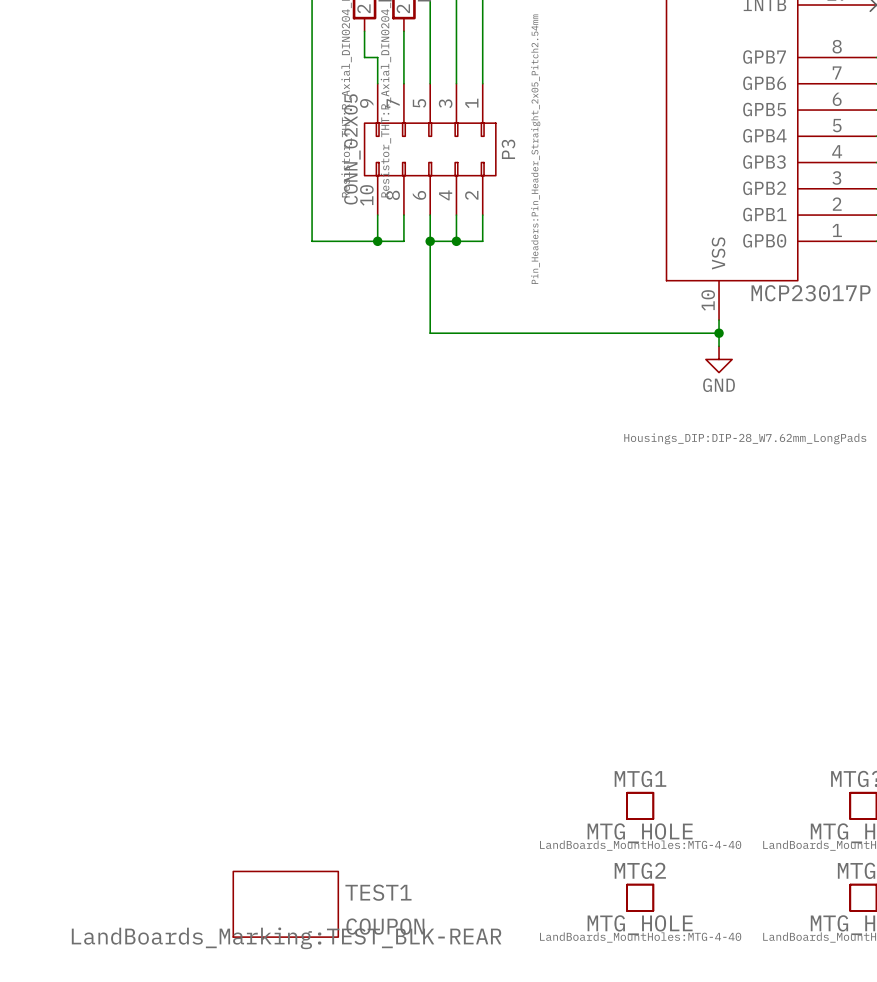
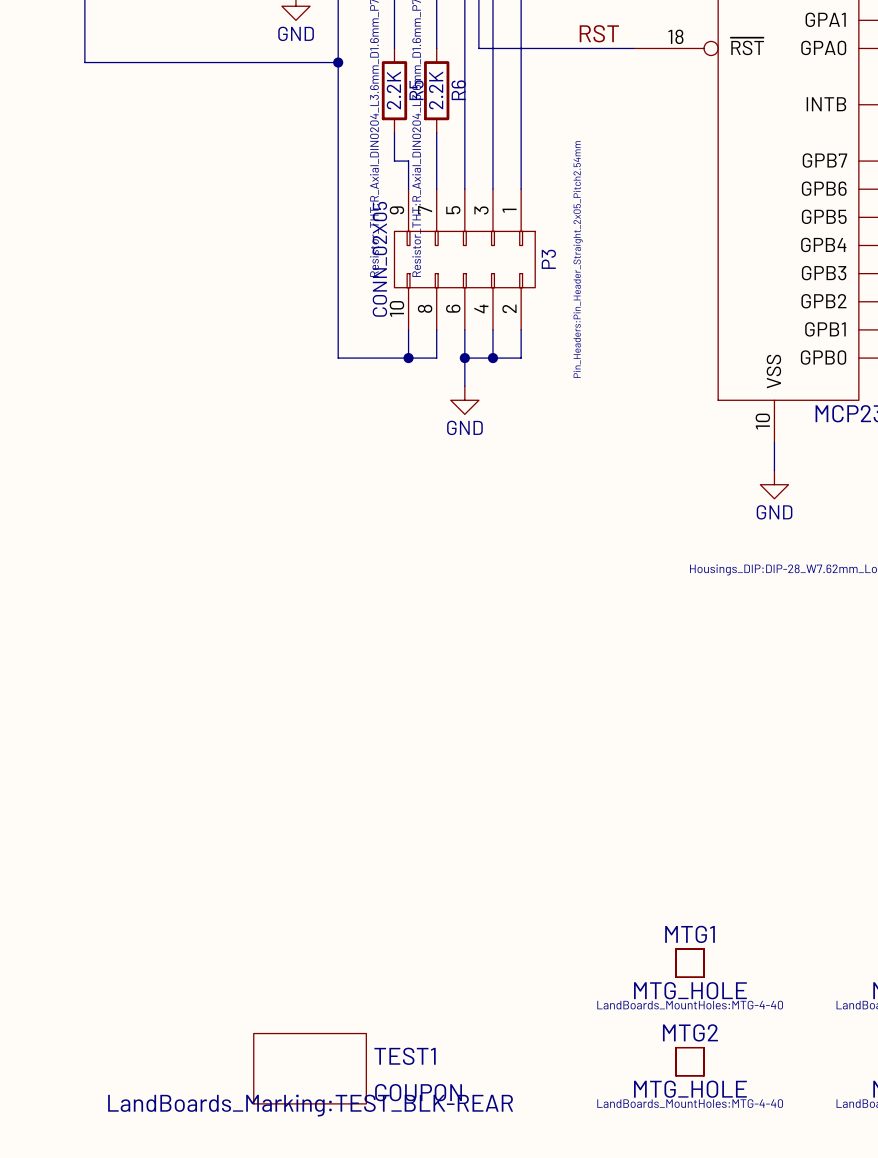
wire: (430, 267) (430, 333) (719, 333) -> none
power symbol: none -> GND (464, 400)
junction: (719, 333) -> none

